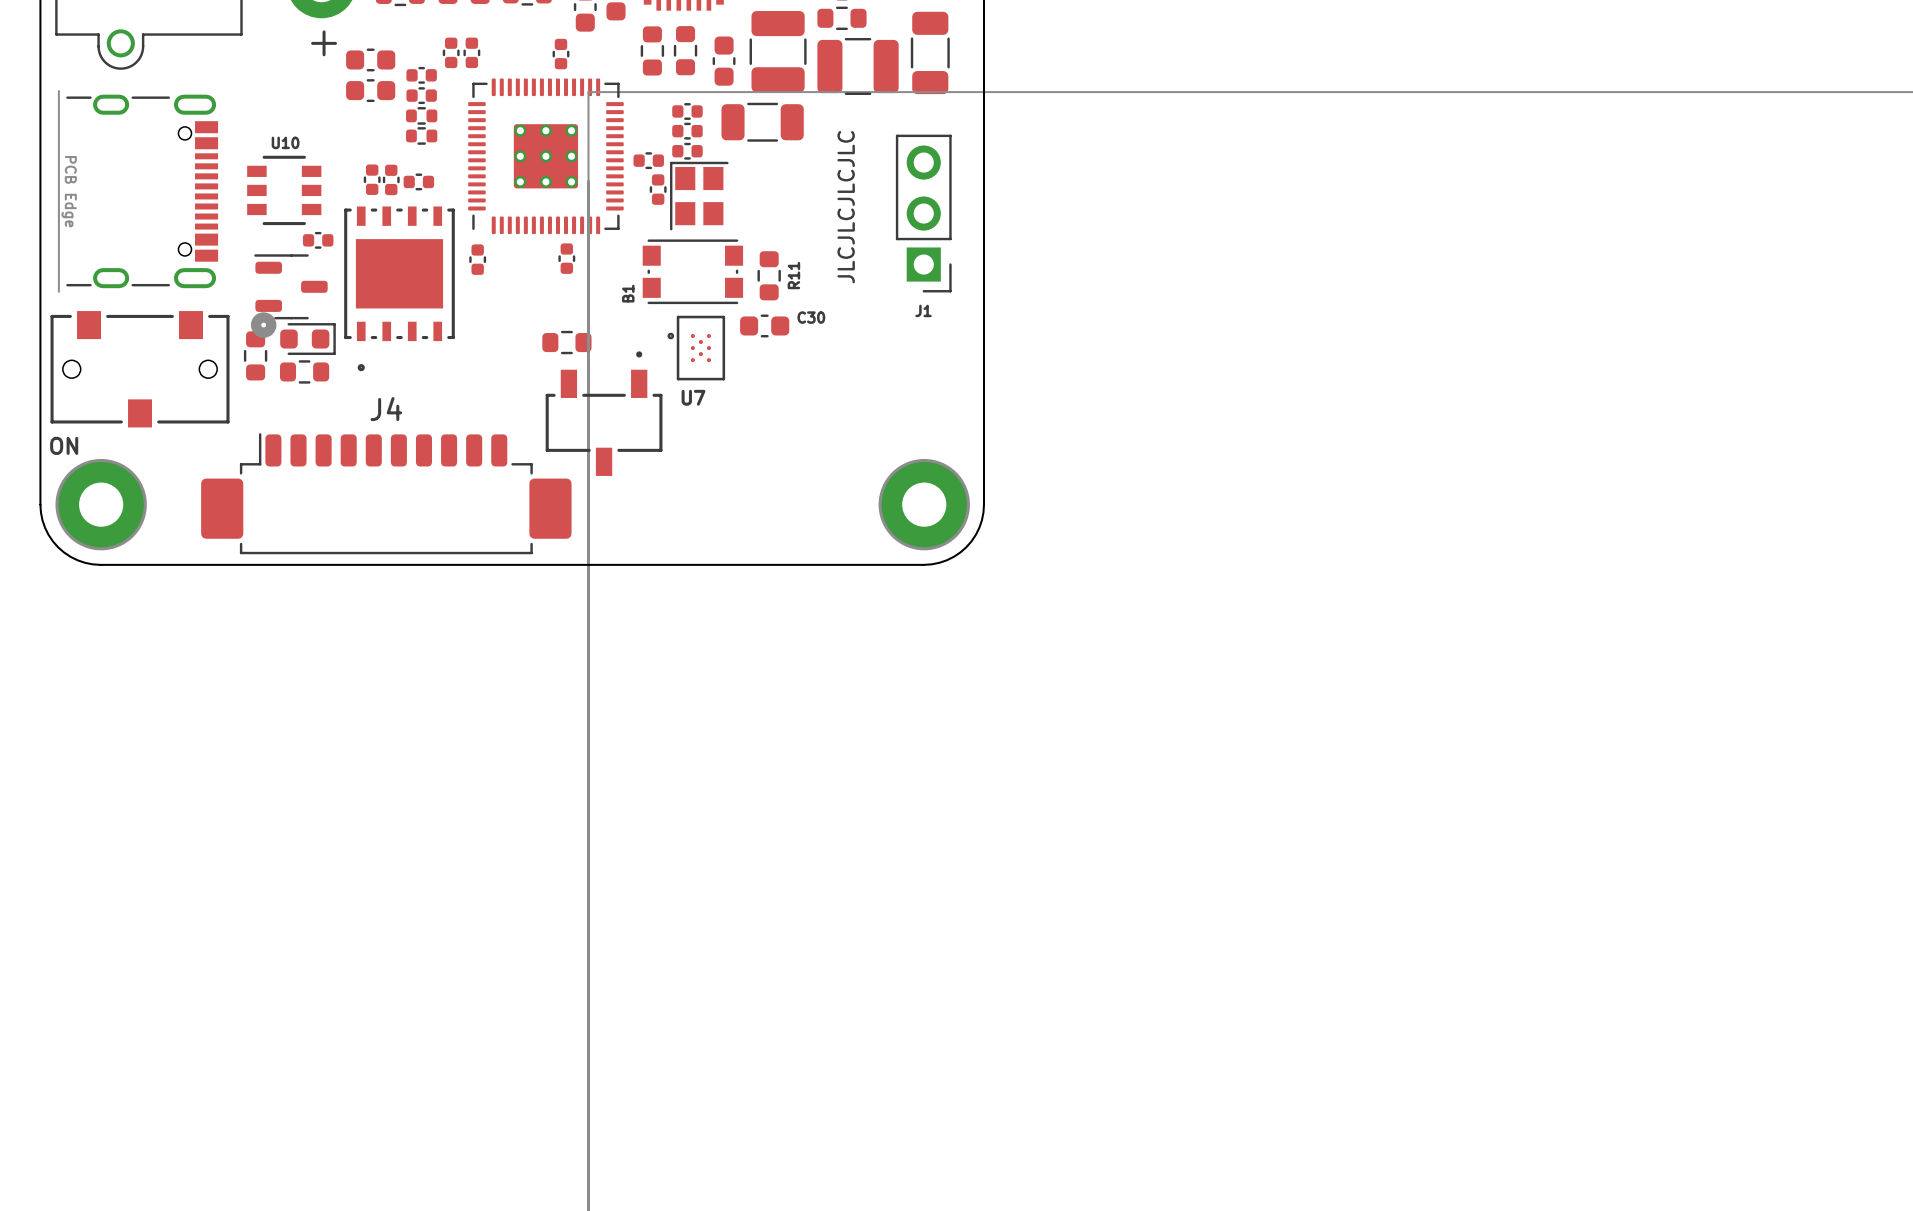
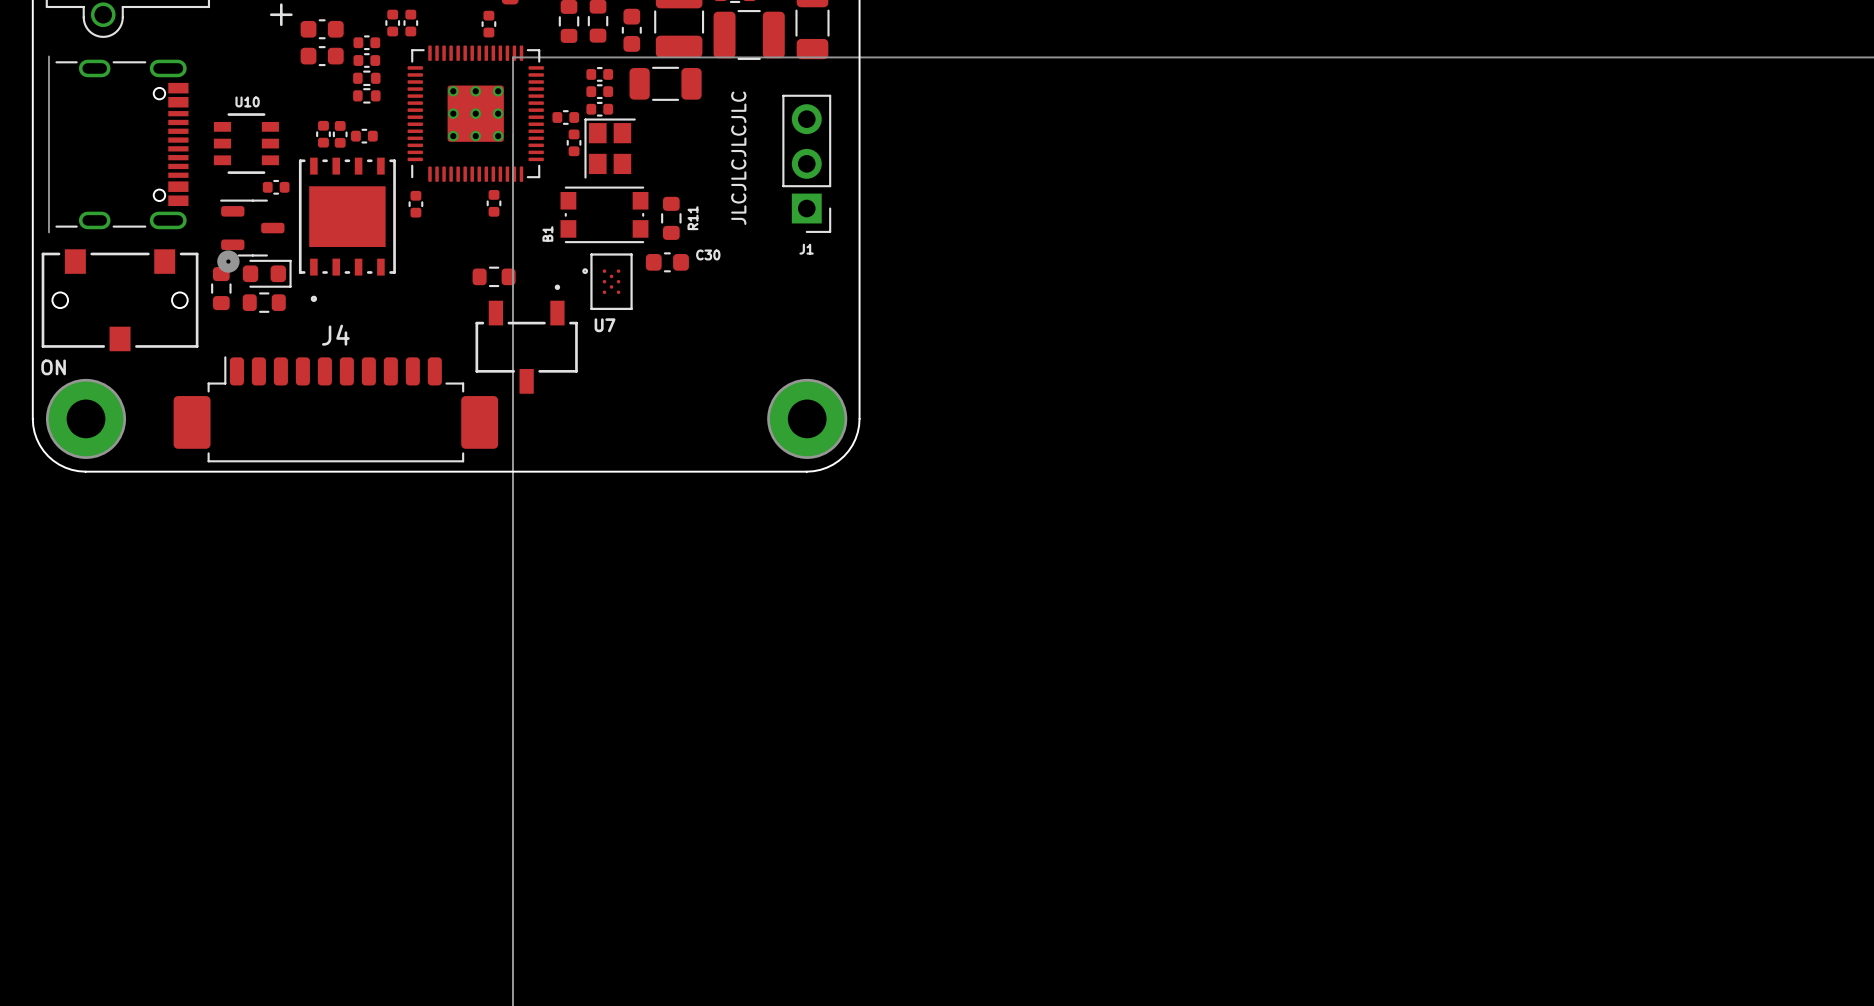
part text: PCB Edge (69, 191) -> none

